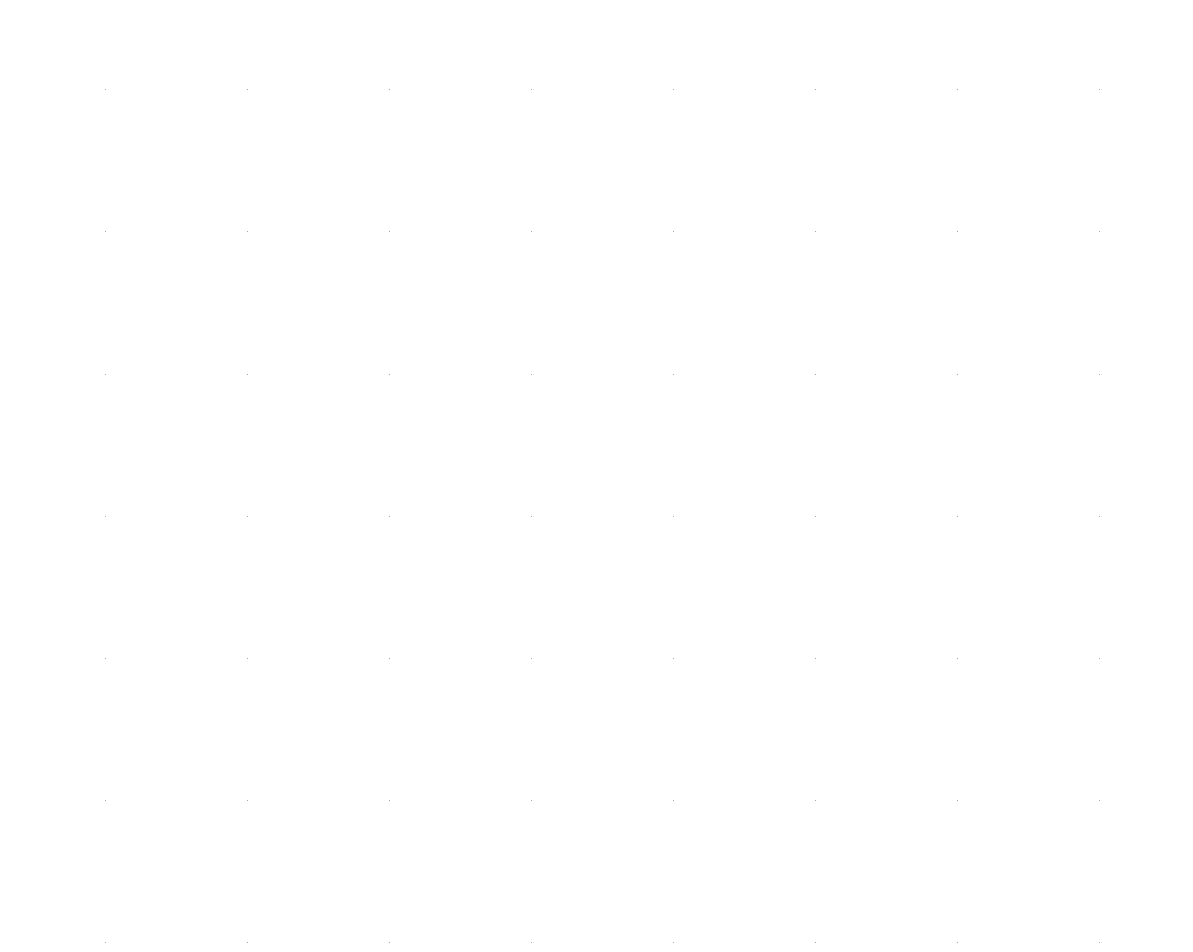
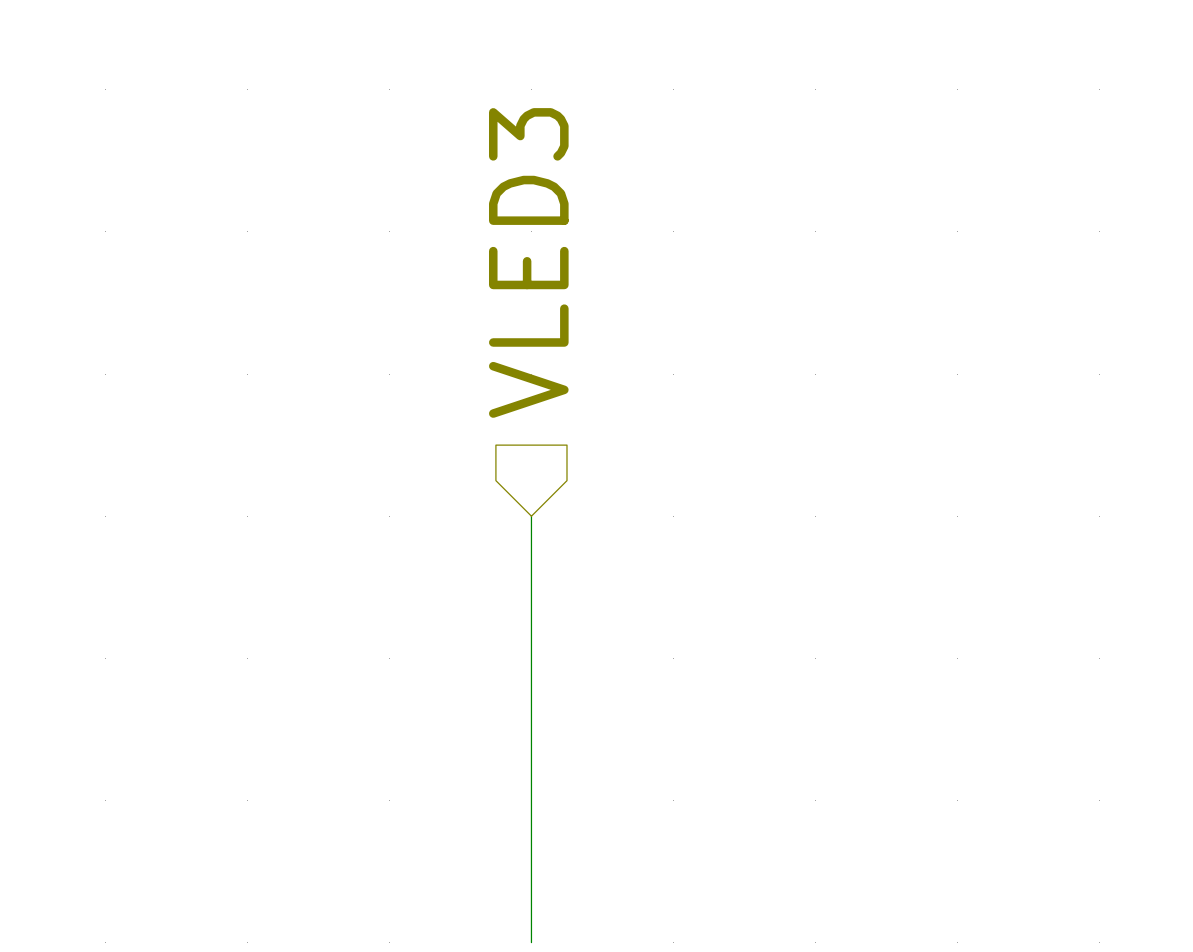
hierarchical label: none -> VLED3 (528, 262)
wire: none -> (531, 516) (531, 942)

